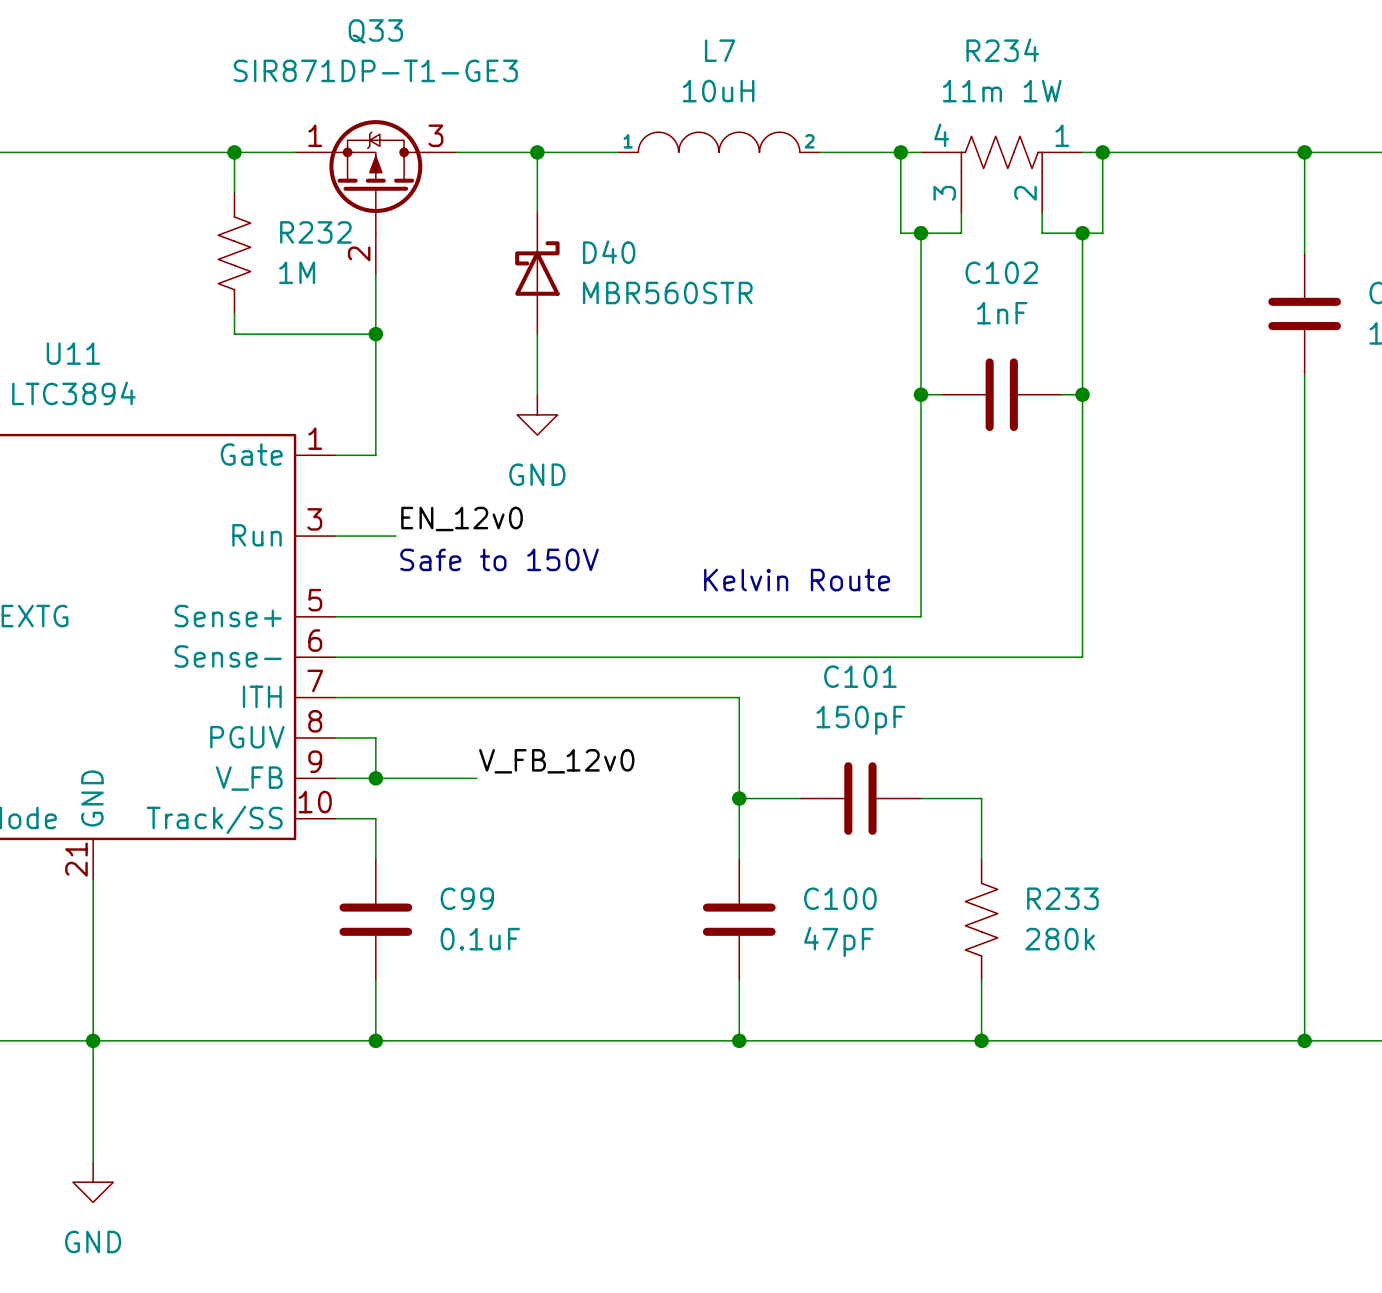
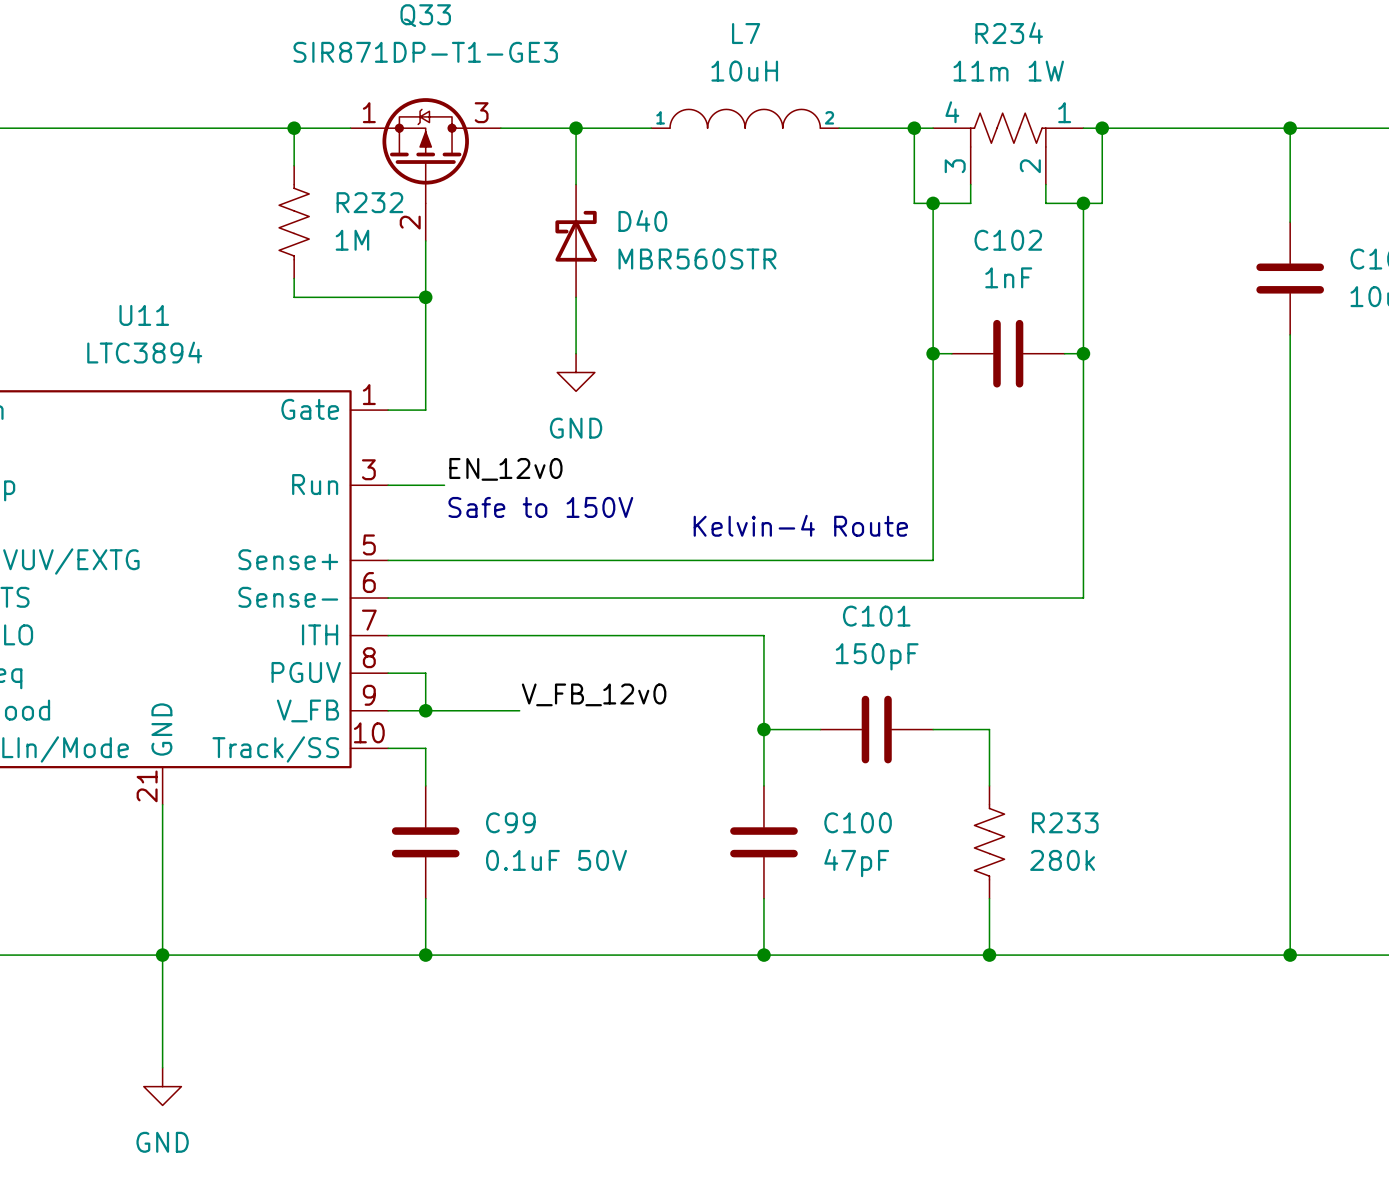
text: Kelvin Route (797, 580) -> Kelvin-4 Route (800, 525)
C99 value: 0.1uF (480, 939) -> 0.1uF 50V (556, 860)

